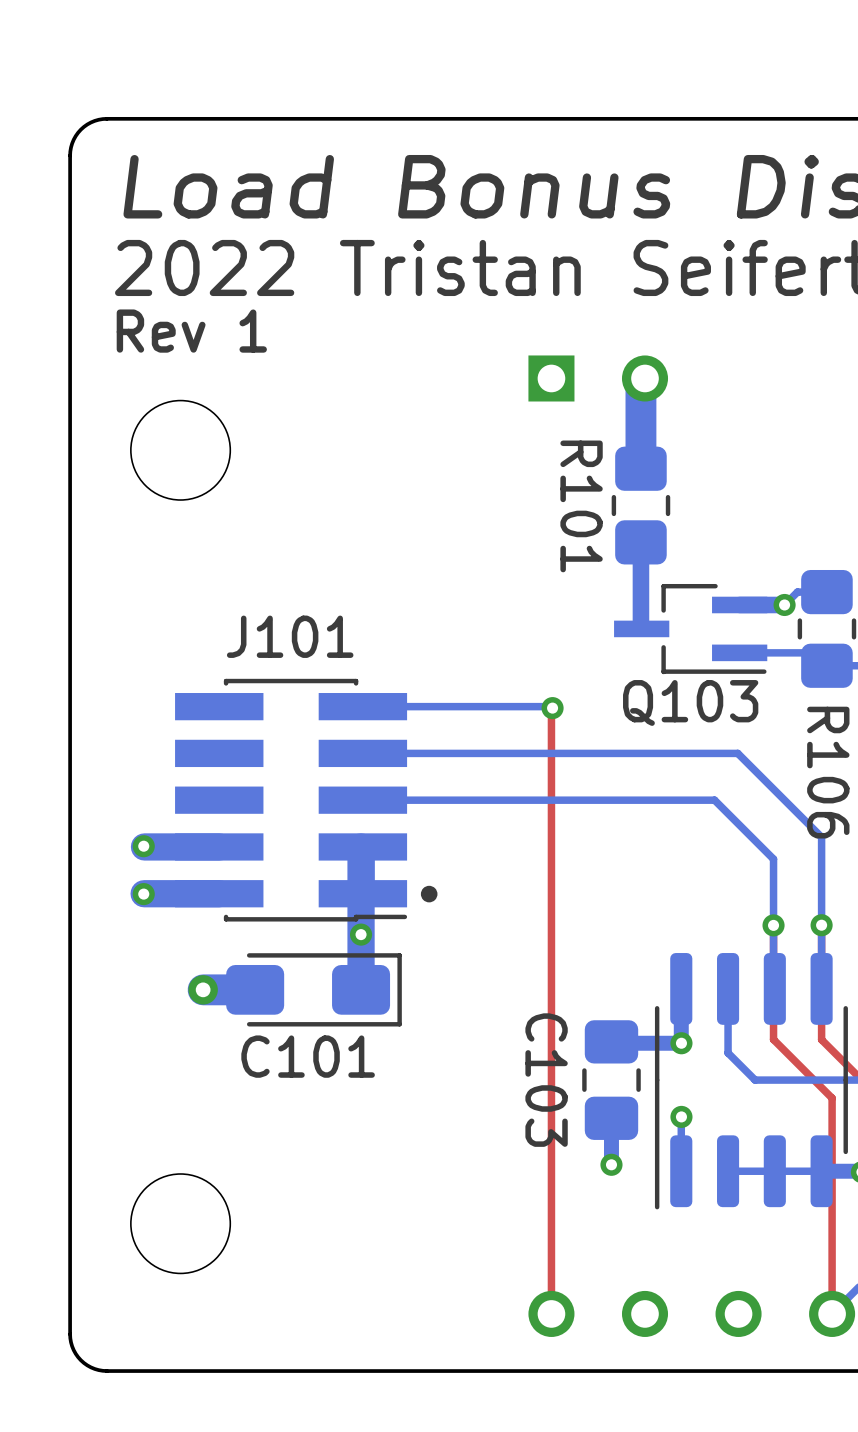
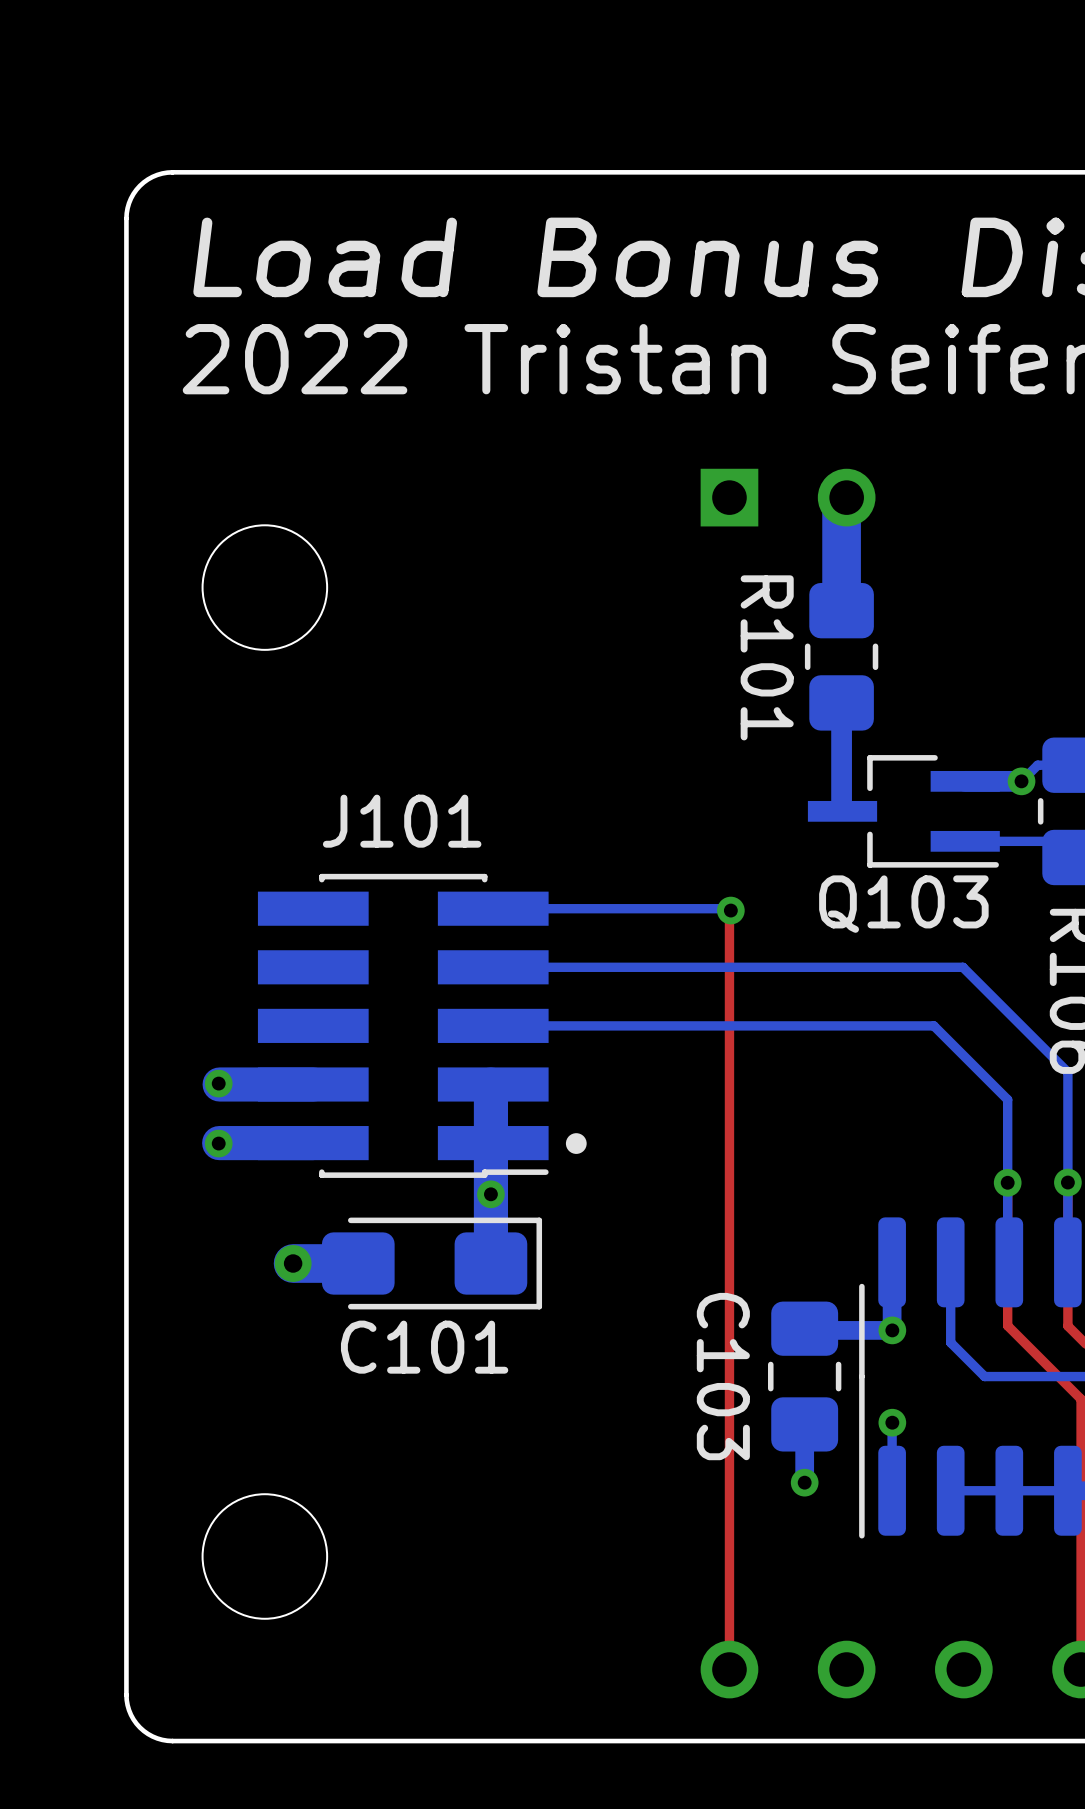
text: Rev 1 (191, 331) -> none

